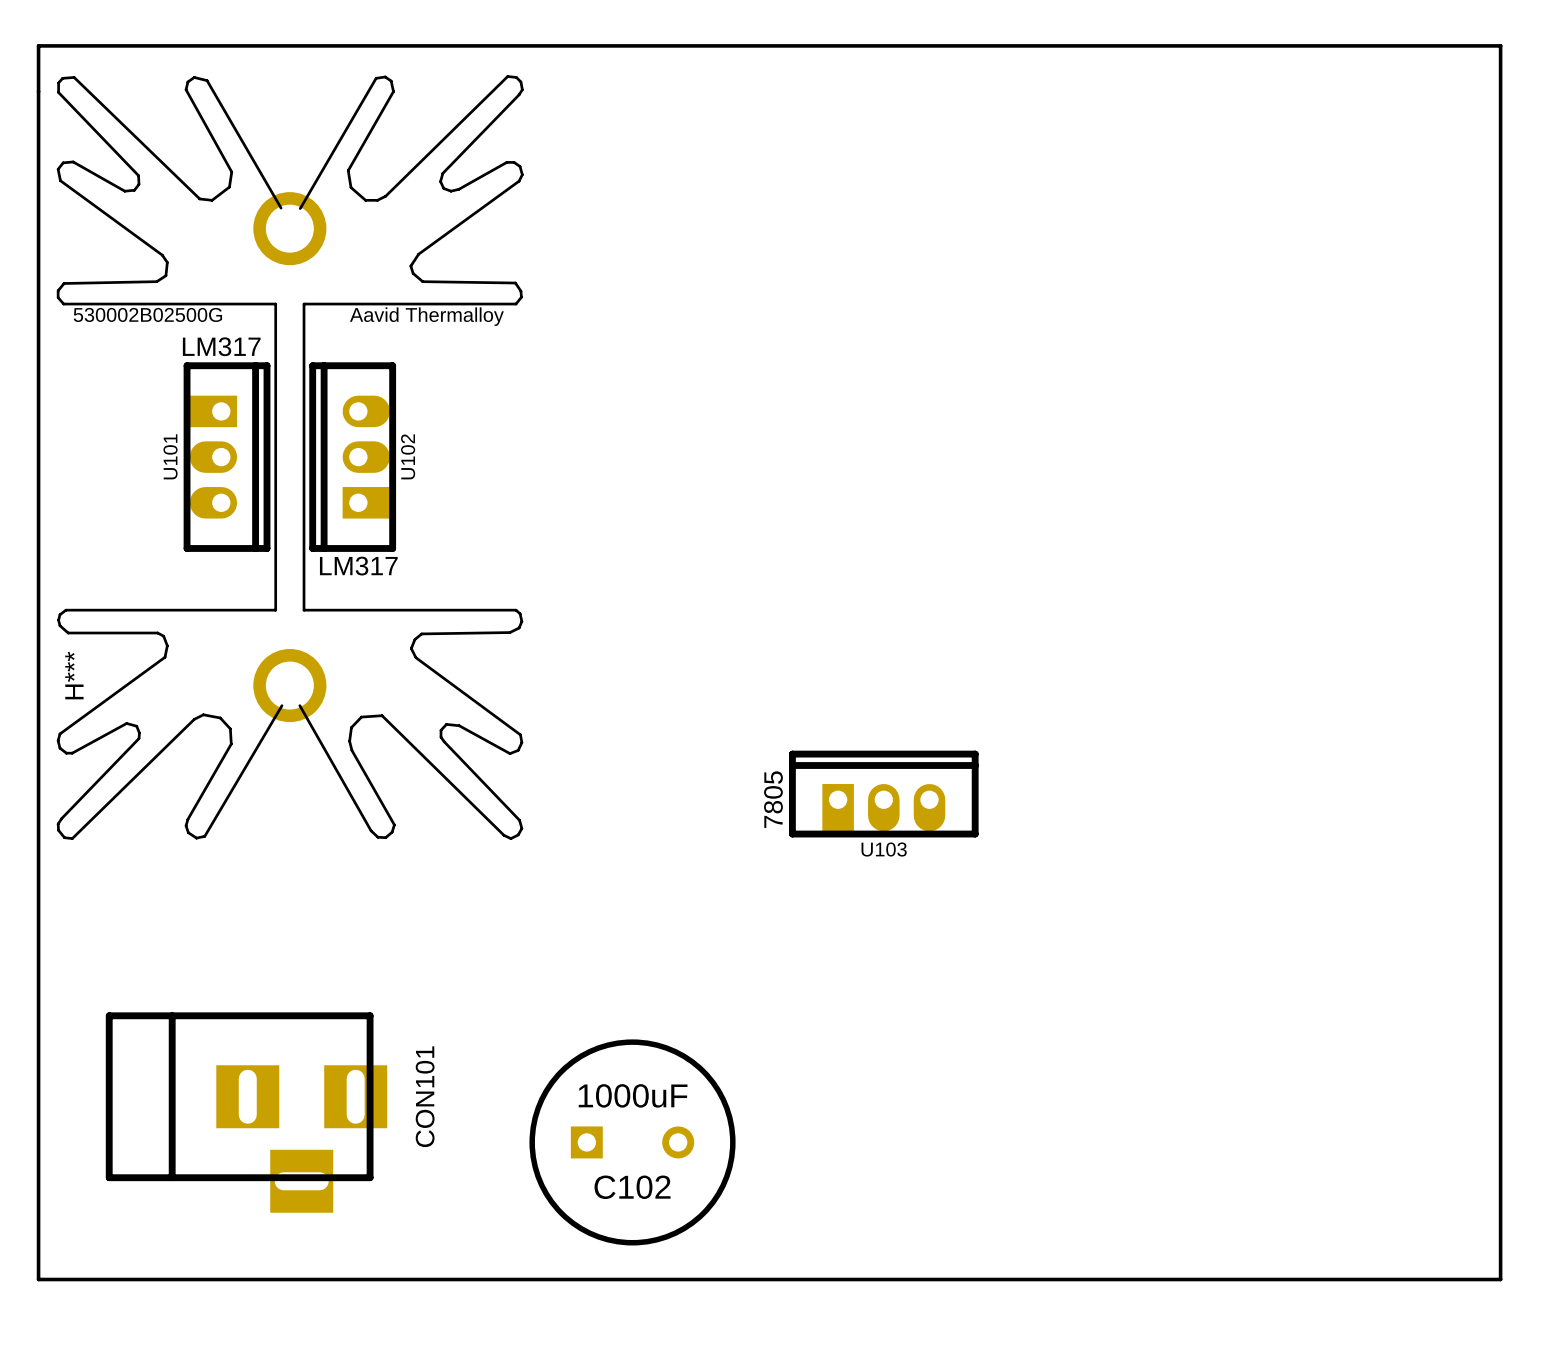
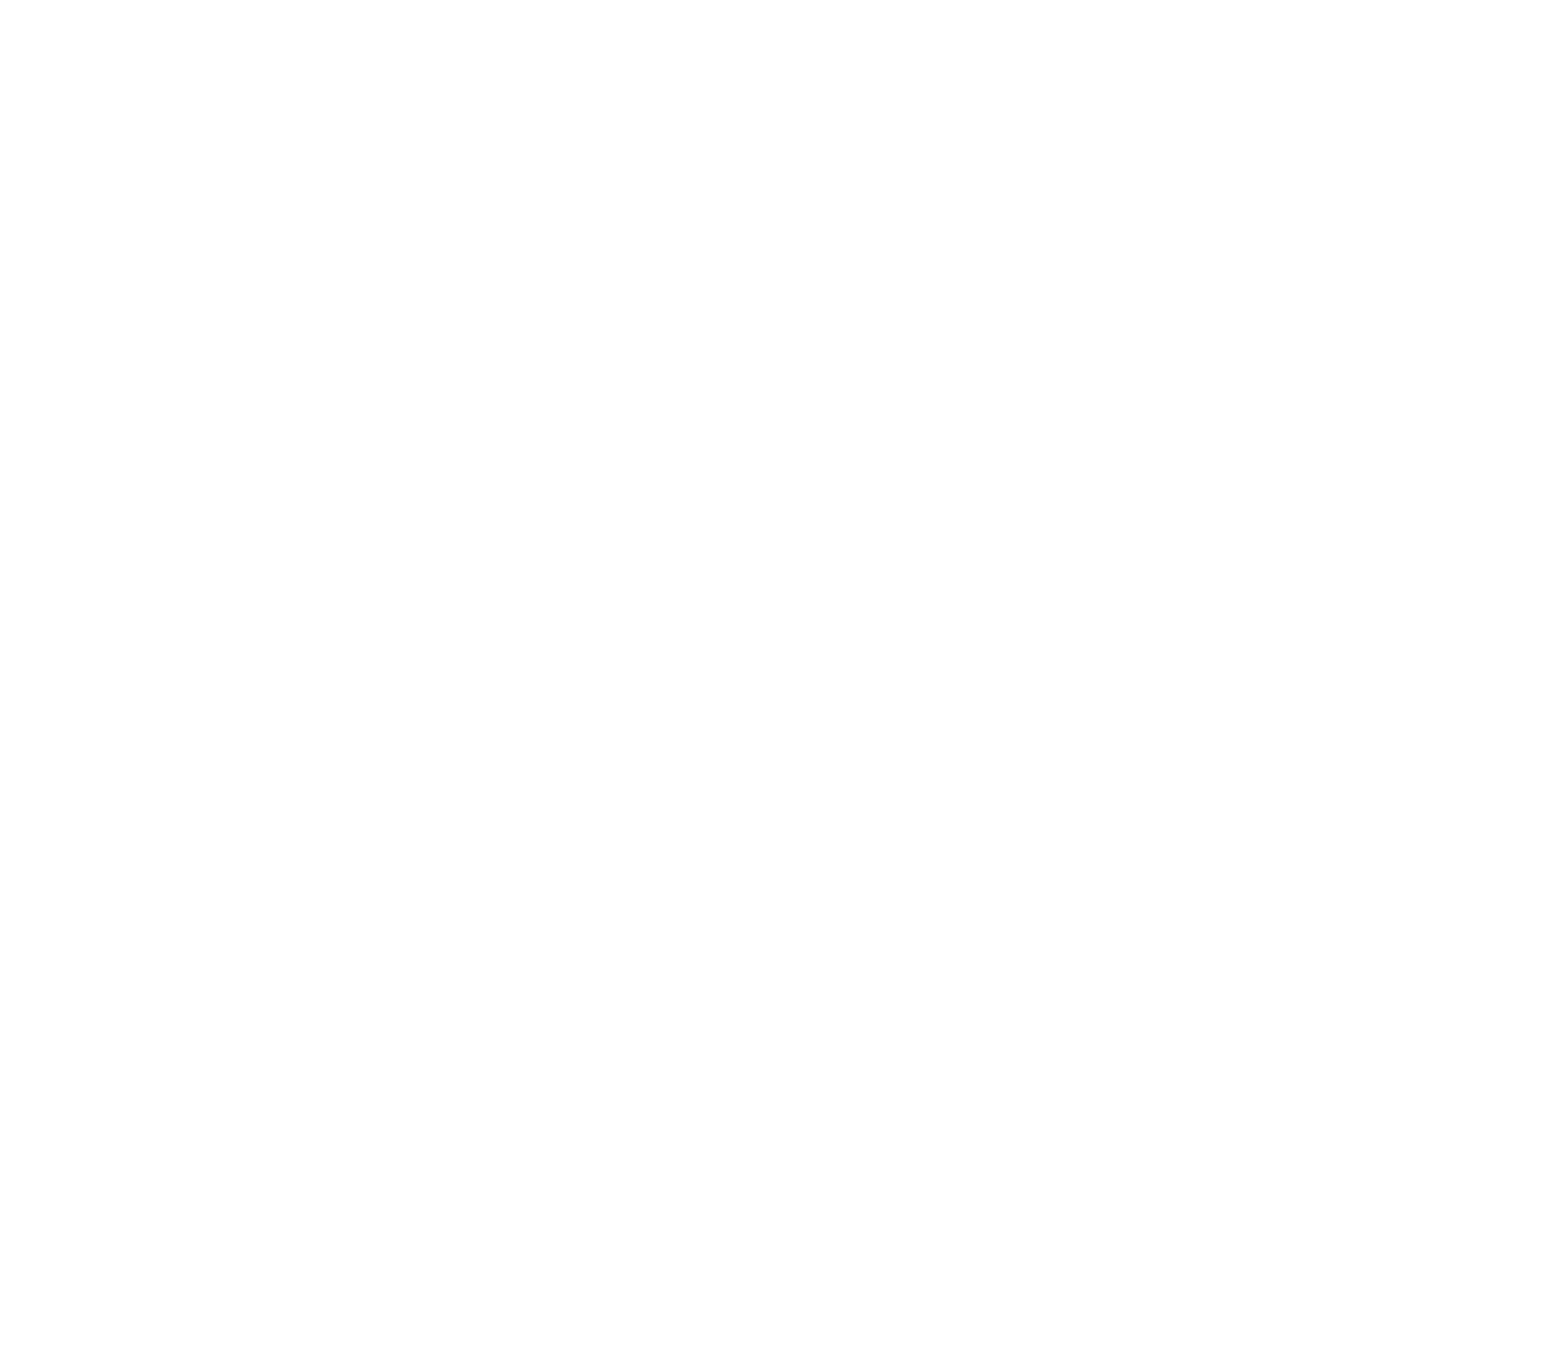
line: (38, 45) (1500, 45) (1500, 1279) (38, 1279) (38, 45) -> none
U101: LM317 (227, 457) -> none
H***: 530002B02500G (290, 457) -> none
U102: LM317 (352, 457) -> none
U103: 7805 (883, 794) -> none
CON101: (246, 1112) -> none
C102: 1000uF (632, 1142) -> none

